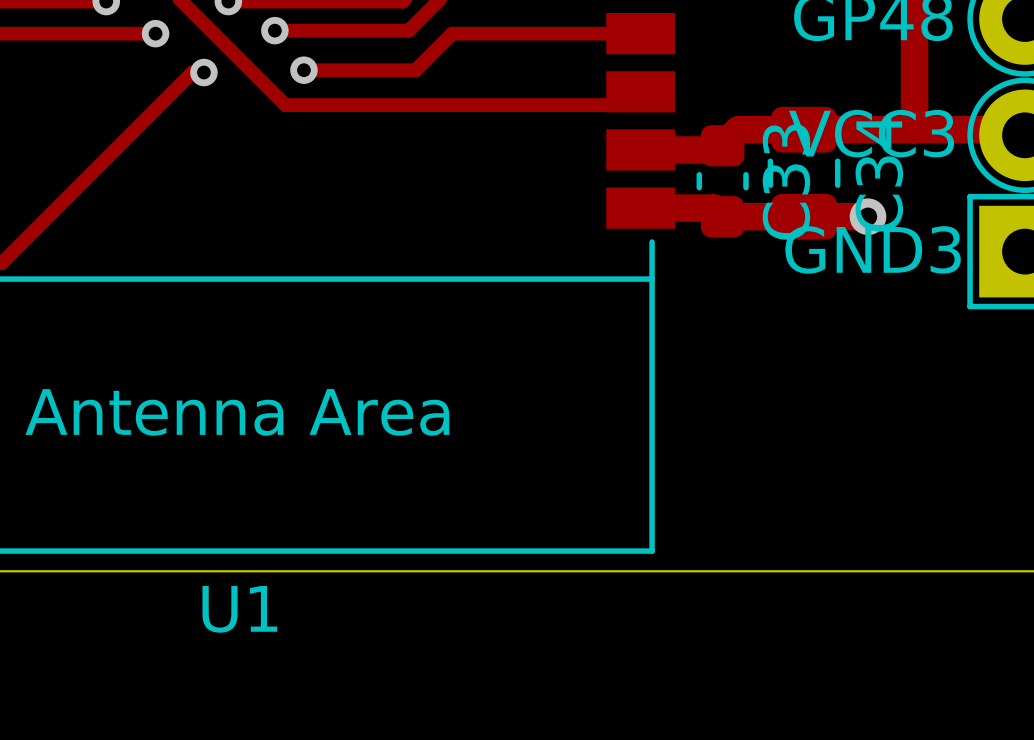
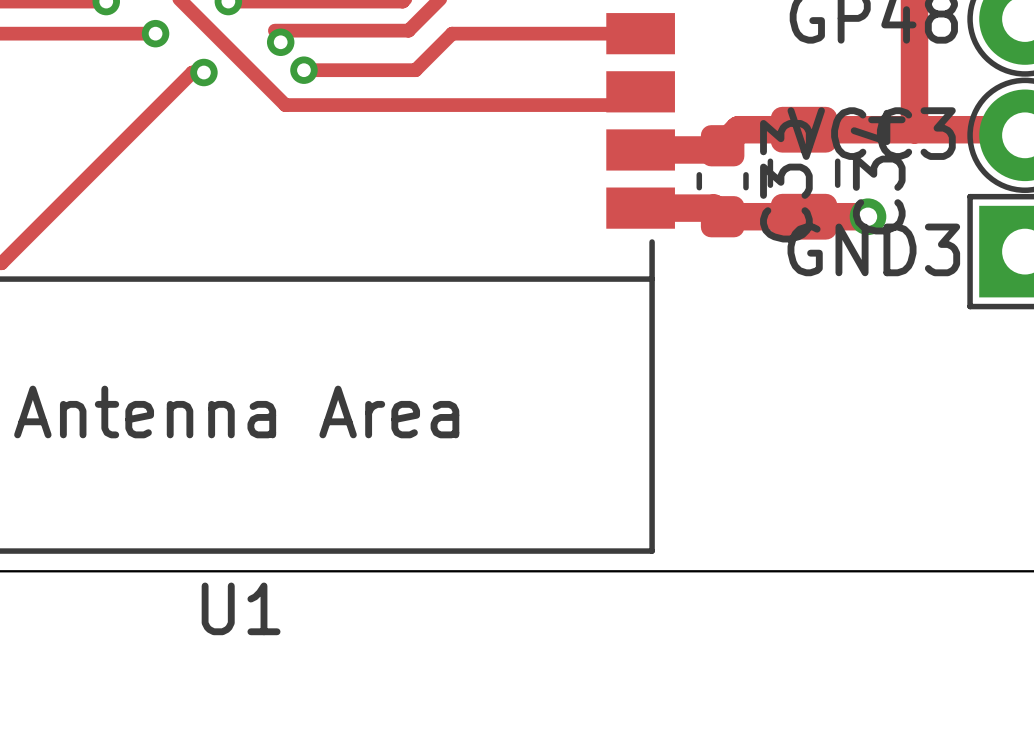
via position: (274, 30) -> (280, 42)

